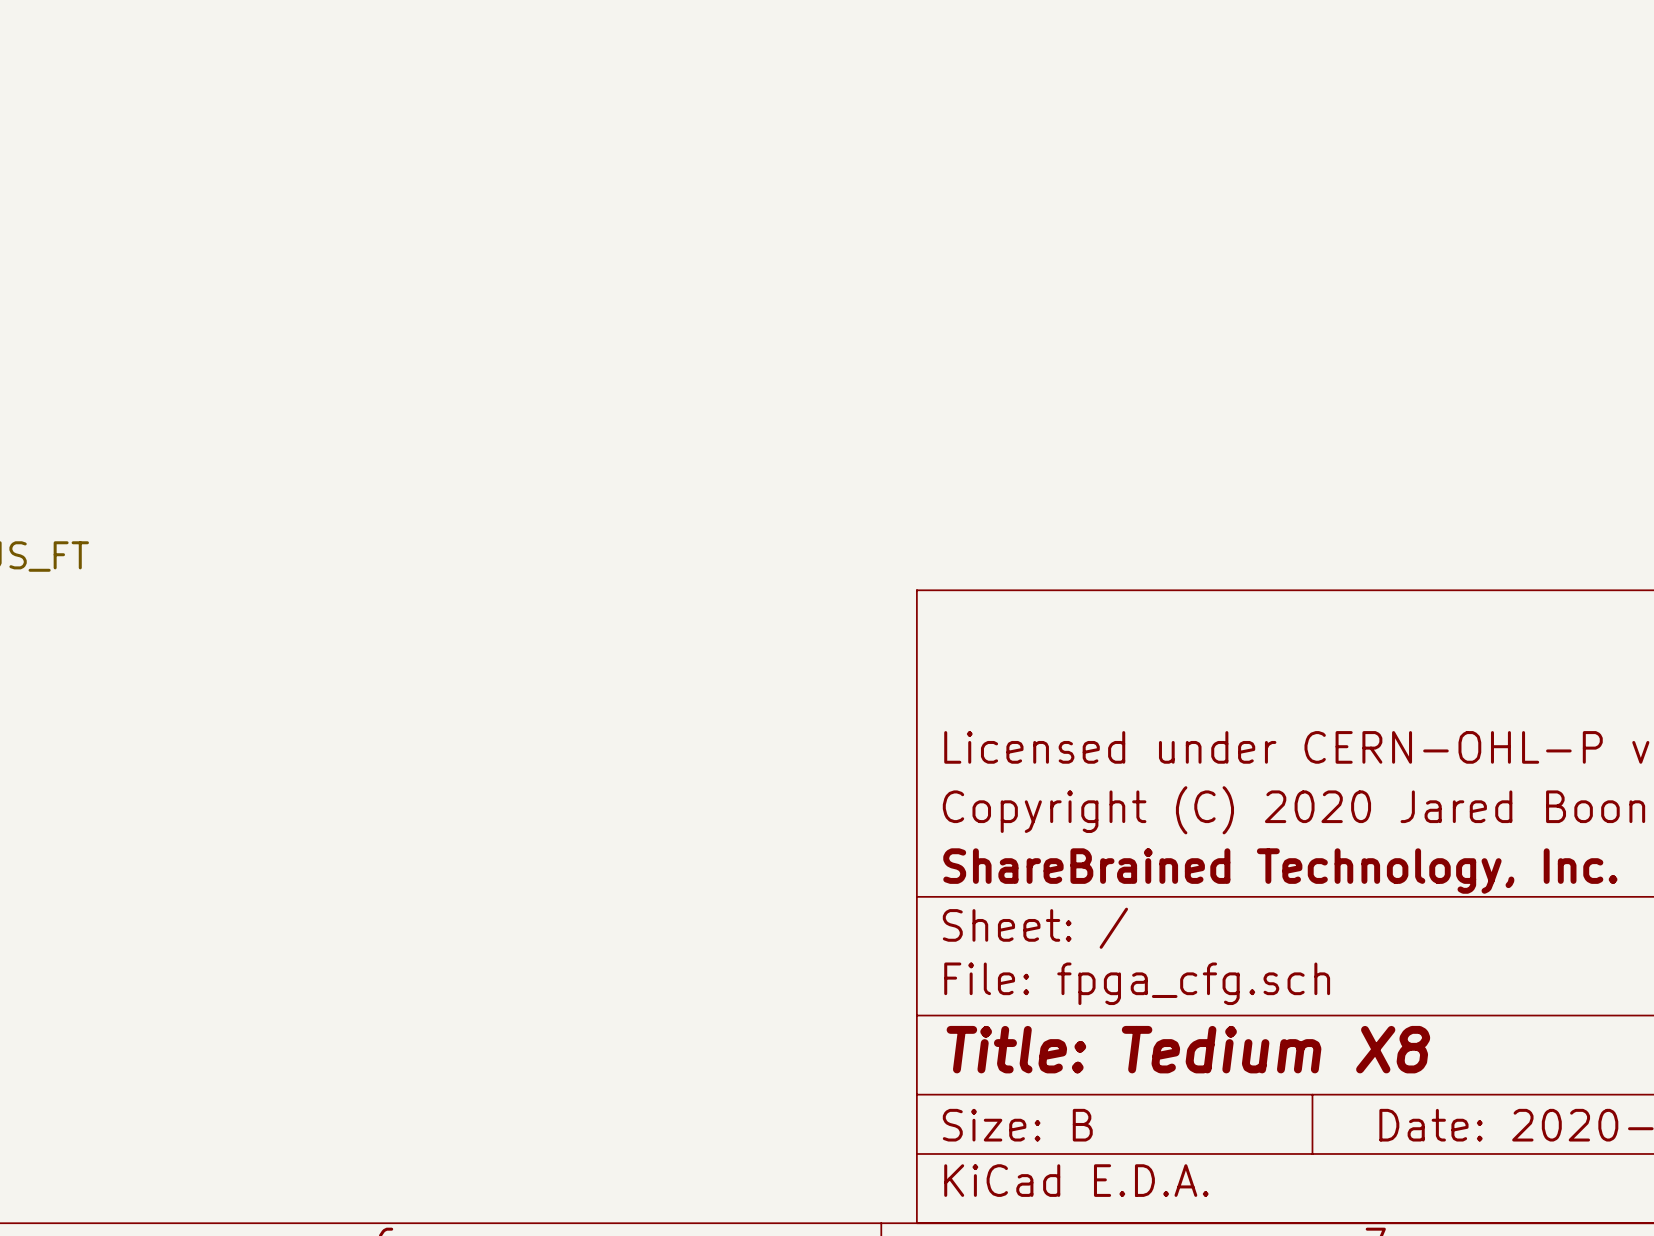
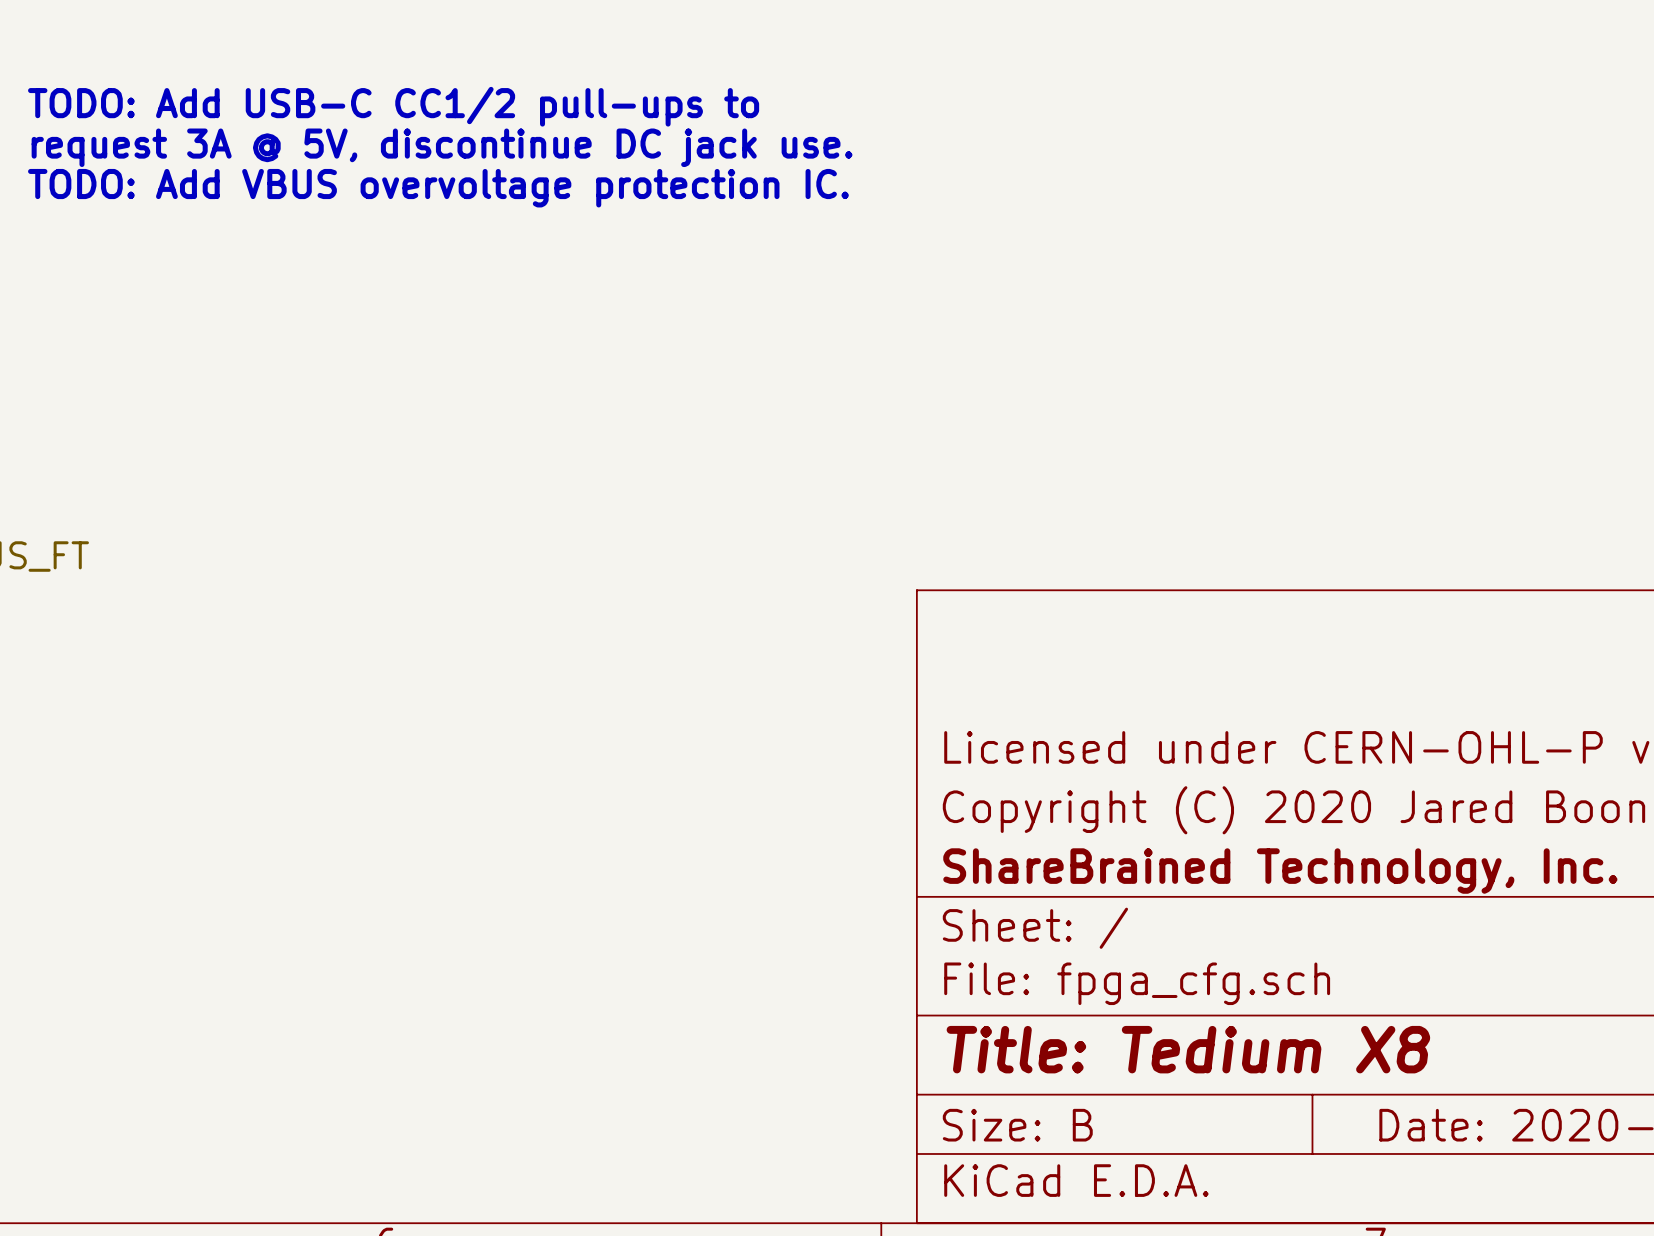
text: none -> TODO: Add USB-C CC1/2 pull-ups to (393, 106)
text: none -> request 3A @ 5V, discontinue DC jack use. (442, 147)
text: none -> TODO: Add VBUS overvoltage protection IC. (438, 188)

